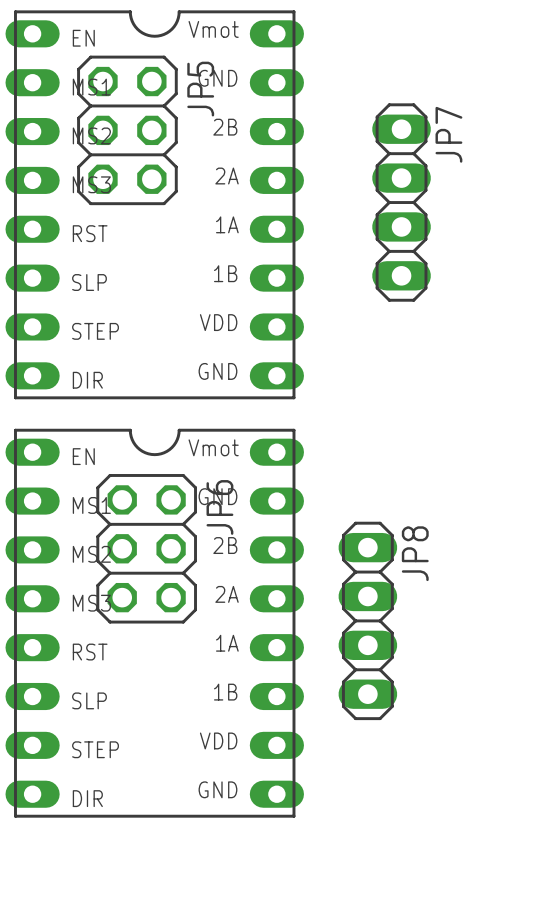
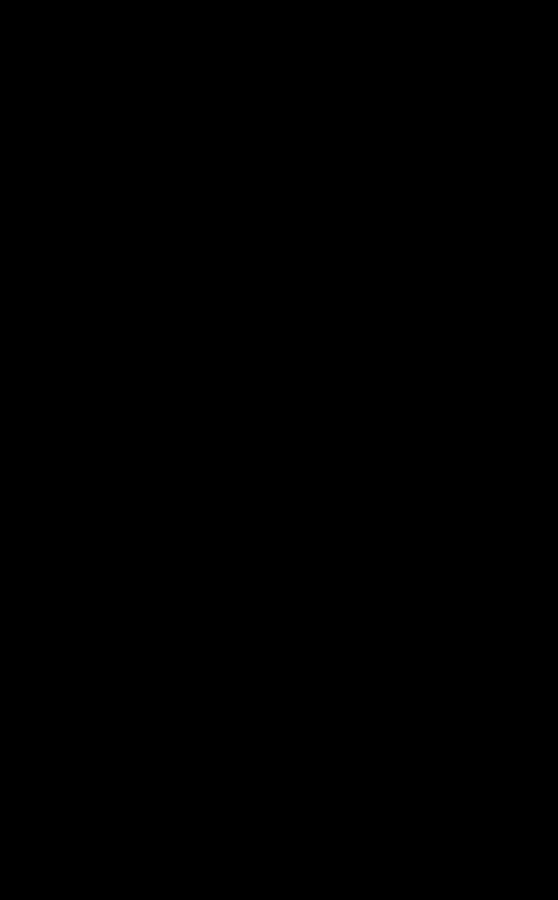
JP5: (127, 130) -> none
JP7: (401, 202) -> none
part: (154, 204) -> none
JP6: (146, 548) -> none
JP8: (367, 620) -> none
part: (154, 623) -> none

